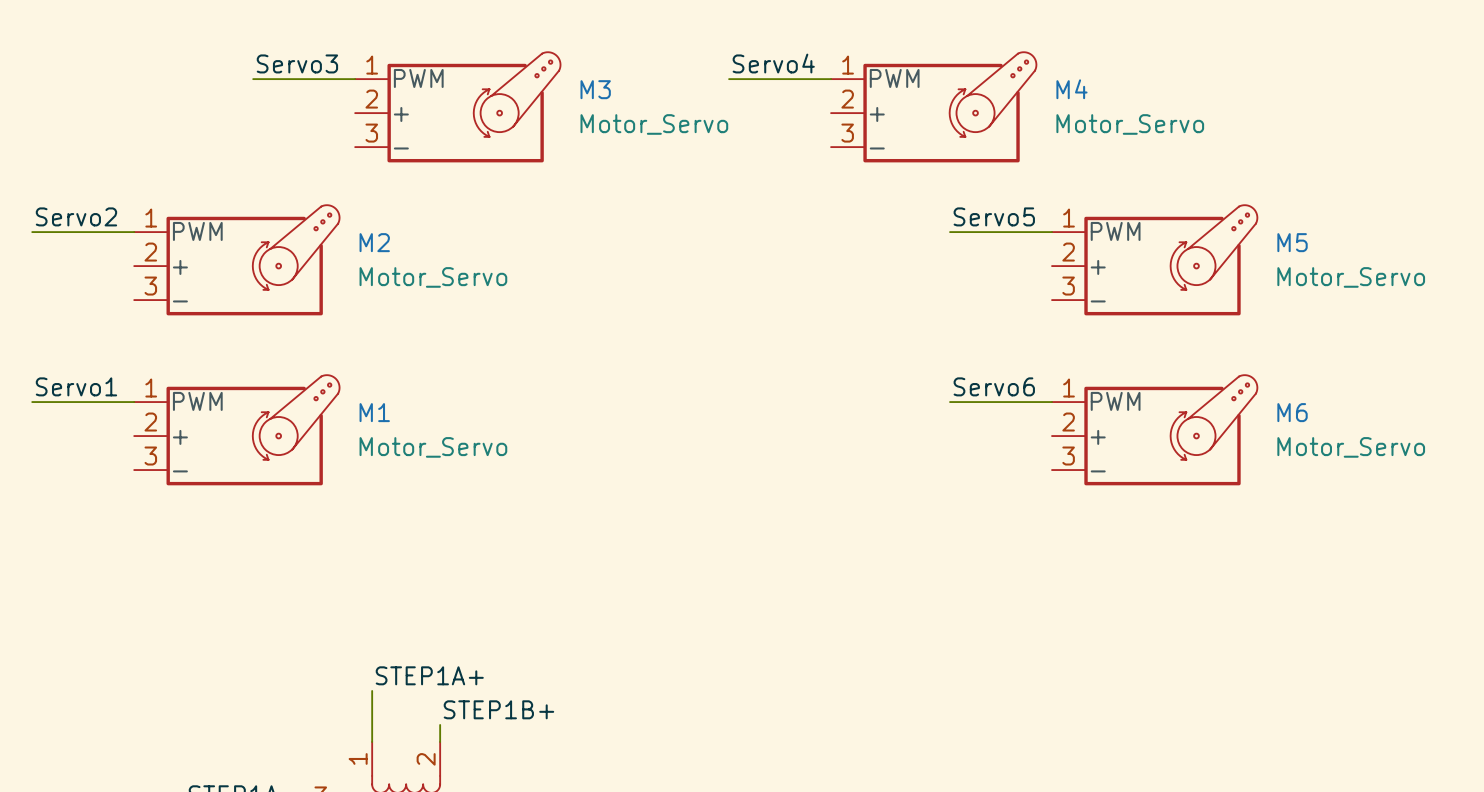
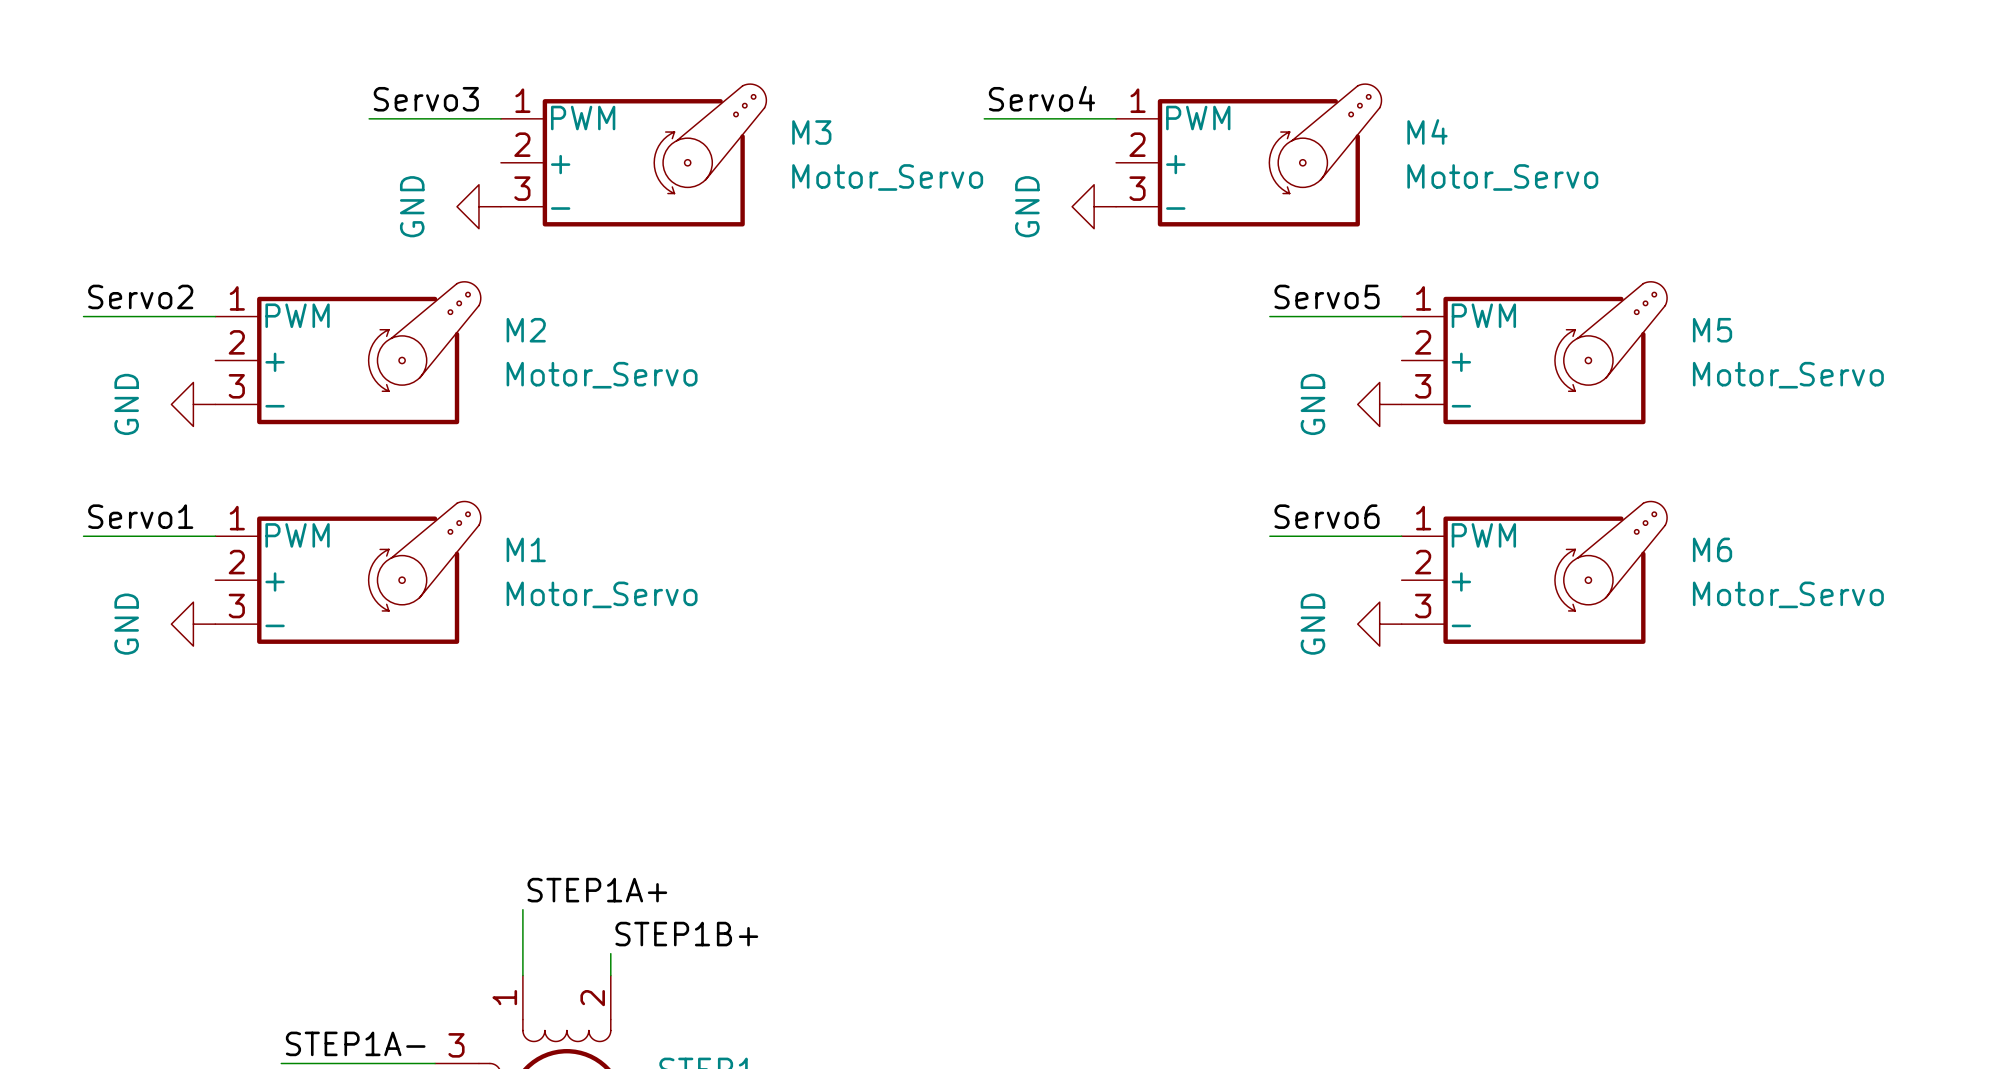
power symbol: none -> GND (478, 206)
power symbol: none -> GND (1094, 206)
power symbol: none -> GND (193, 404)
power symbol: none -> GND (1379, 404)
power symbol: none -> GND (193, 624)
power symbol: none -> GND (1379, 624)

